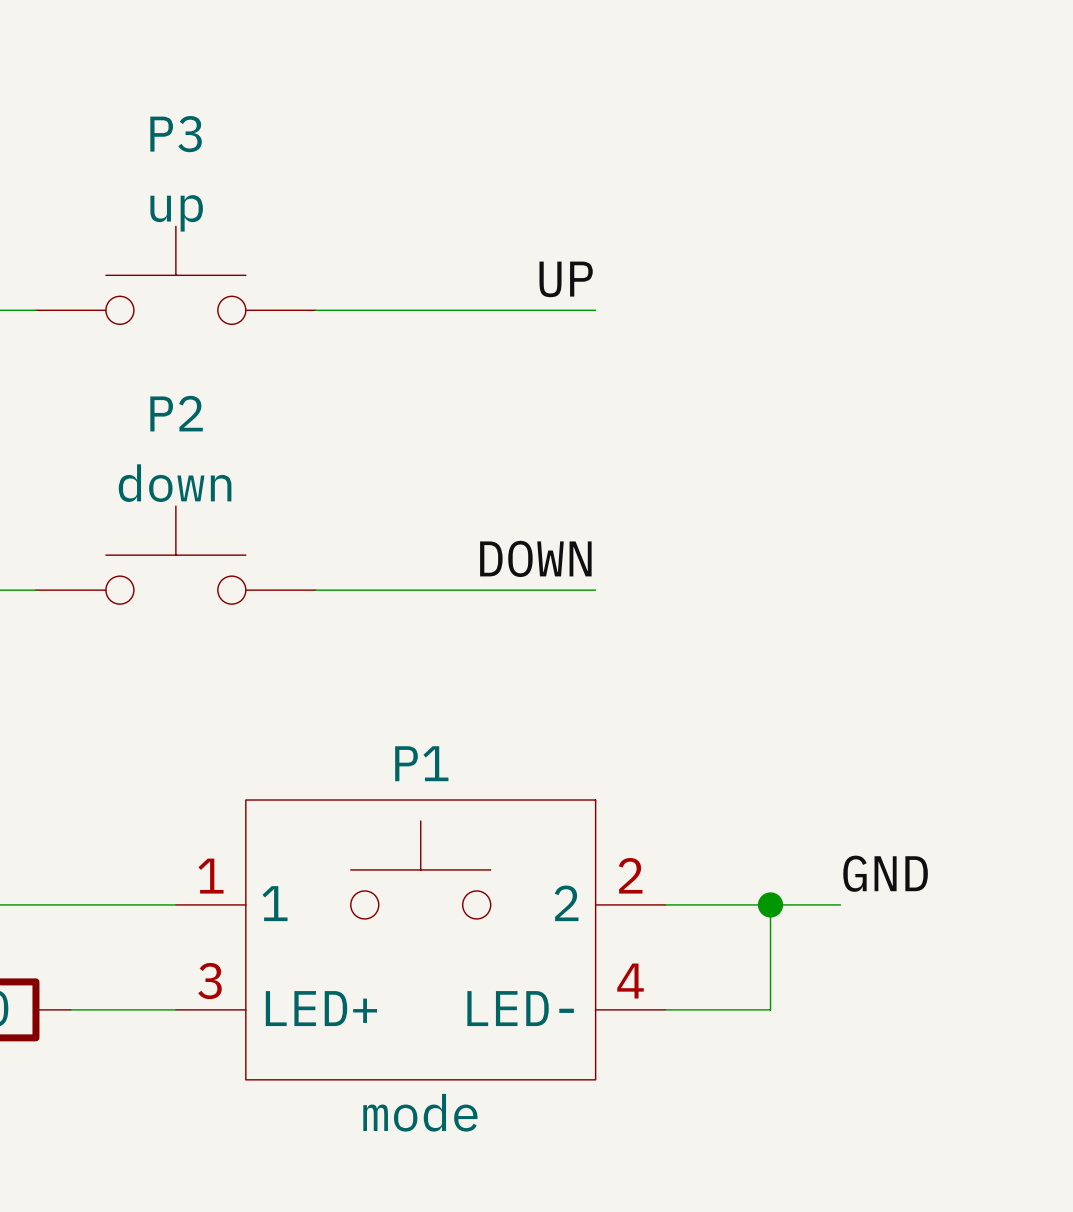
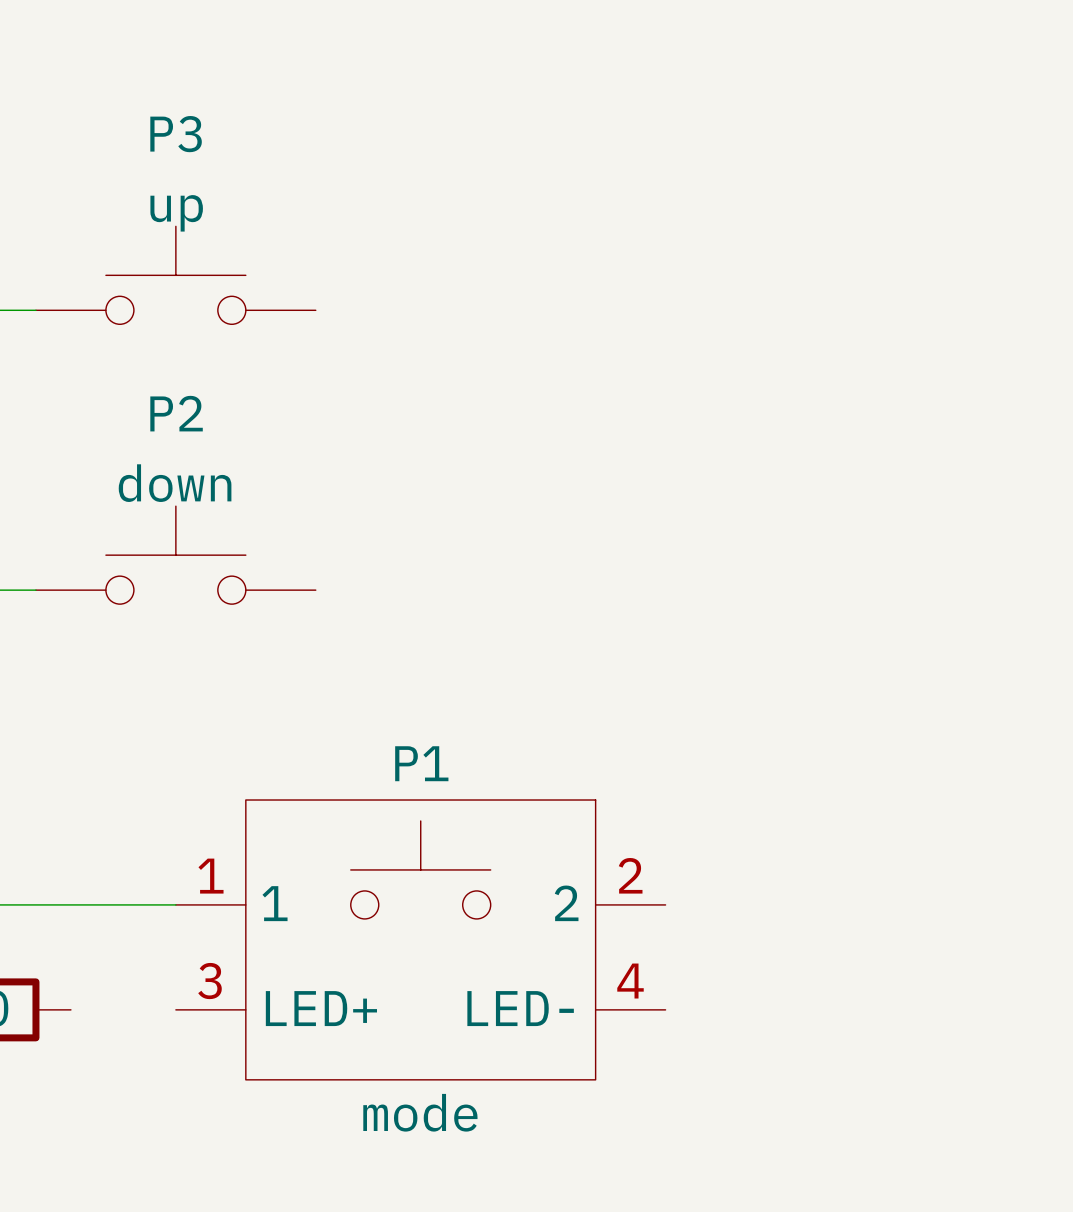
label: UP (566, 279) -> none
wire: (315, 310) (595, 310) -> none
label: DOWN (535, 558) -> none
wire: (315, 590) (595, 590) -> none
label: GND (885, 873) -> none
wire: (665, 904) (840, 904) -> none
wire: (770, 904) (770, 1009) (665, 1009) -> none
junction: (770, 904) -> none
wire: (70, 1009) (175, 1009) -> none

